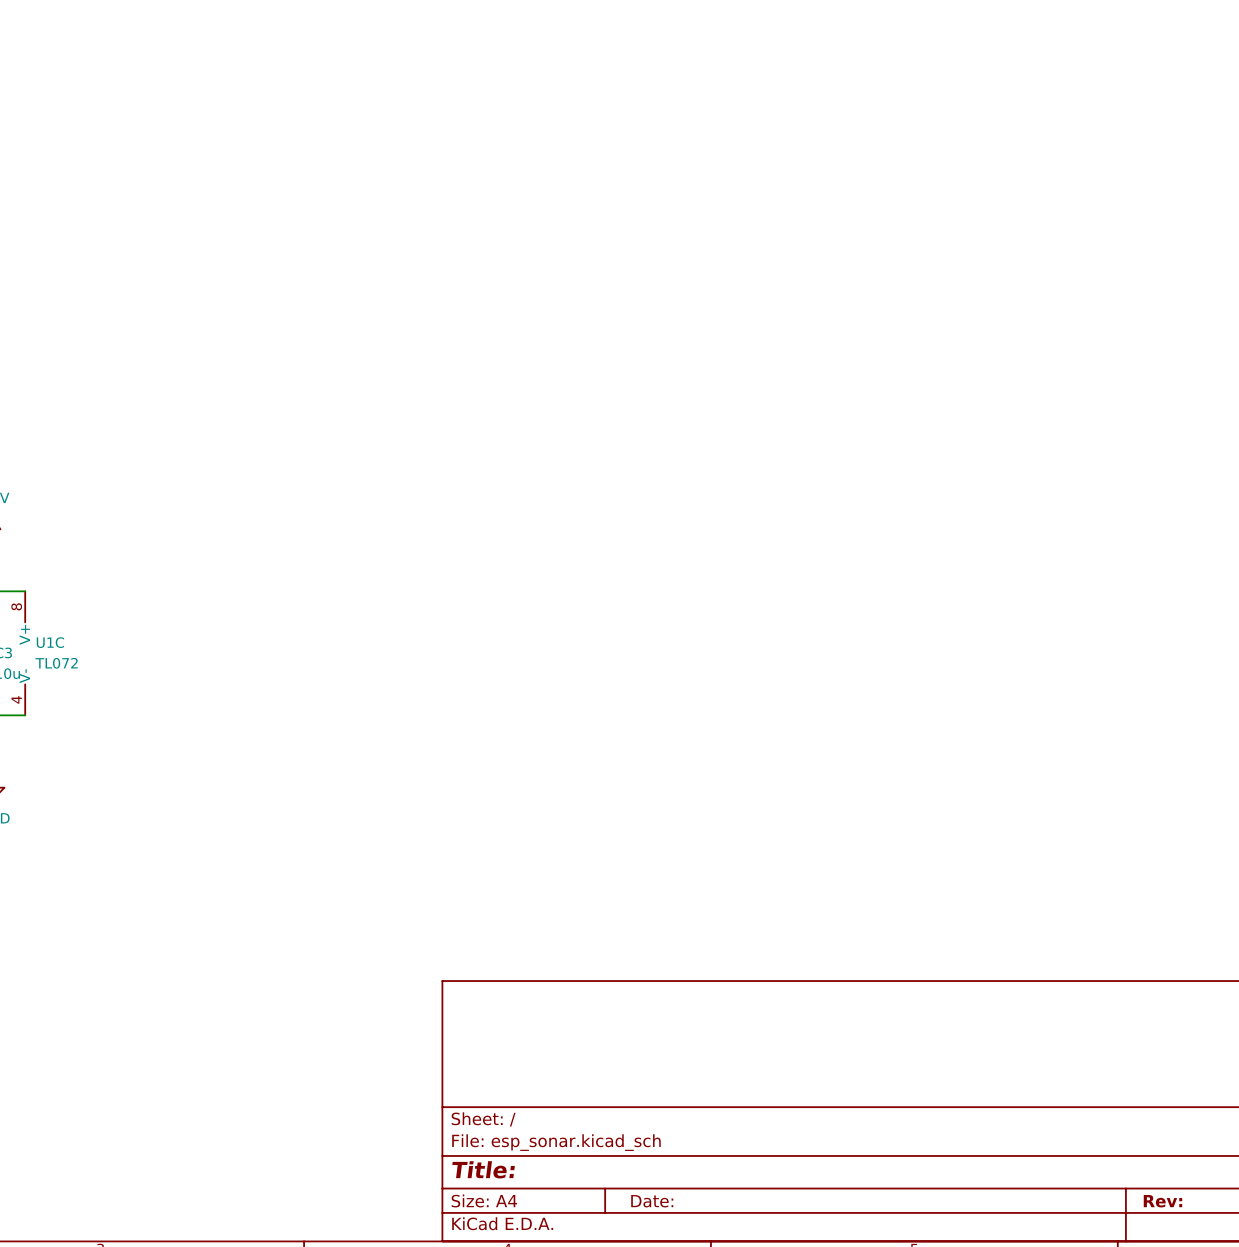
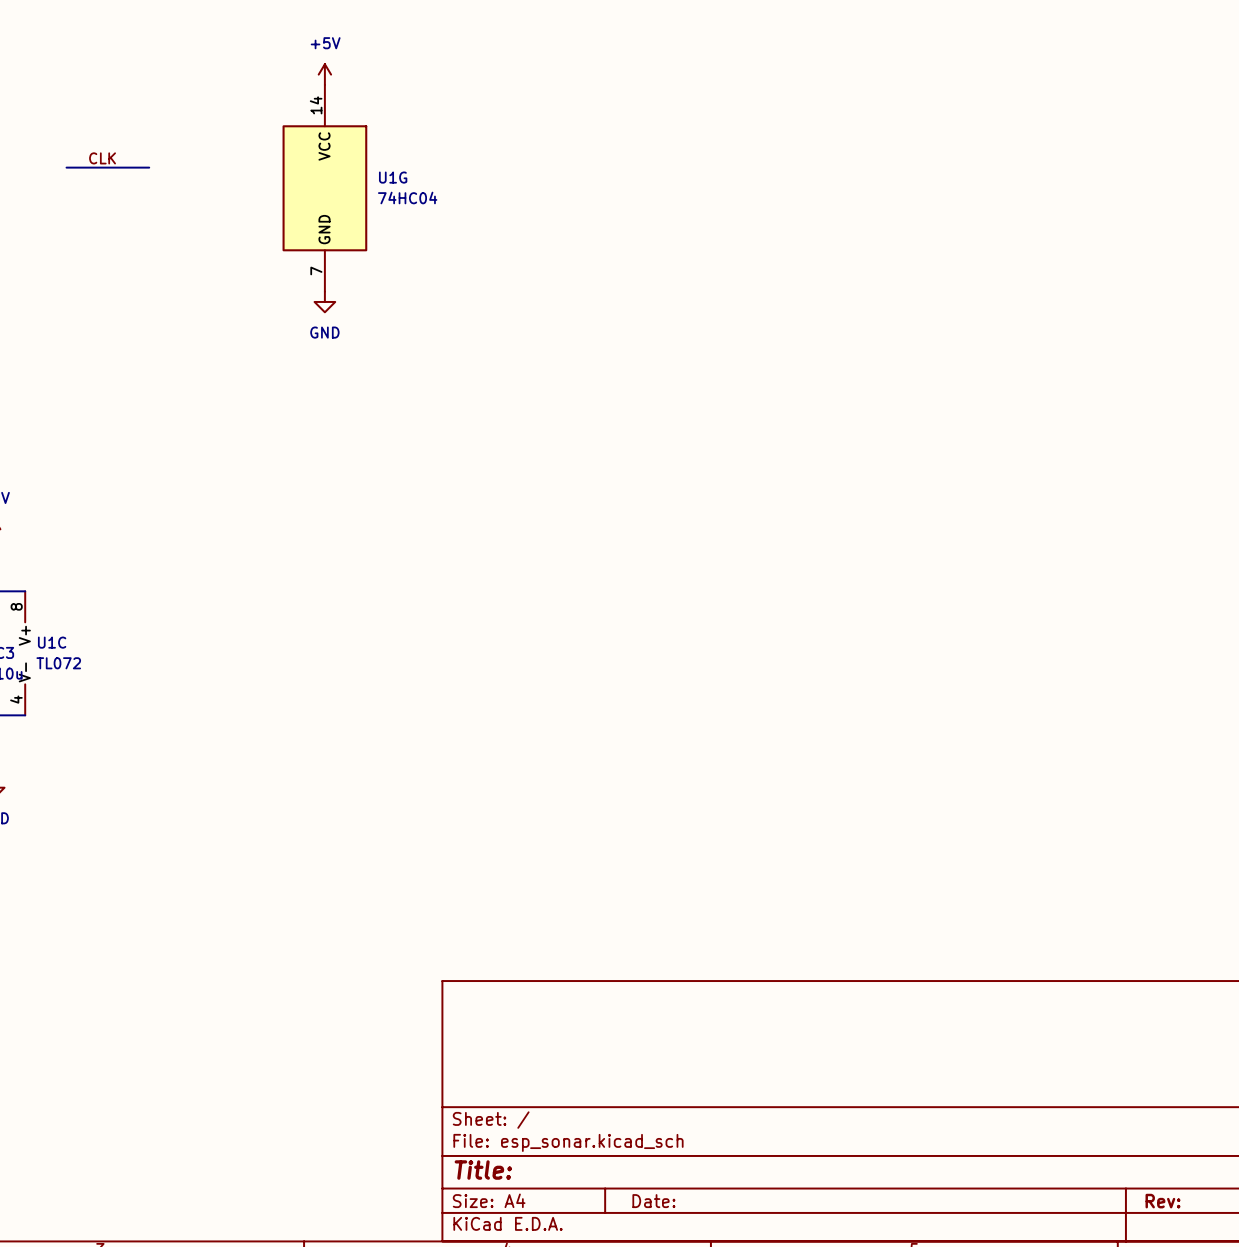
power symbol: none -> +5V (324, 74)
label: none -> CLK (102, 158)
wire: none -> (66, 167) (149, 167)
U1G: none -> 74HC04 (324, 188)
power symbol: none -> GND (324, 301)

